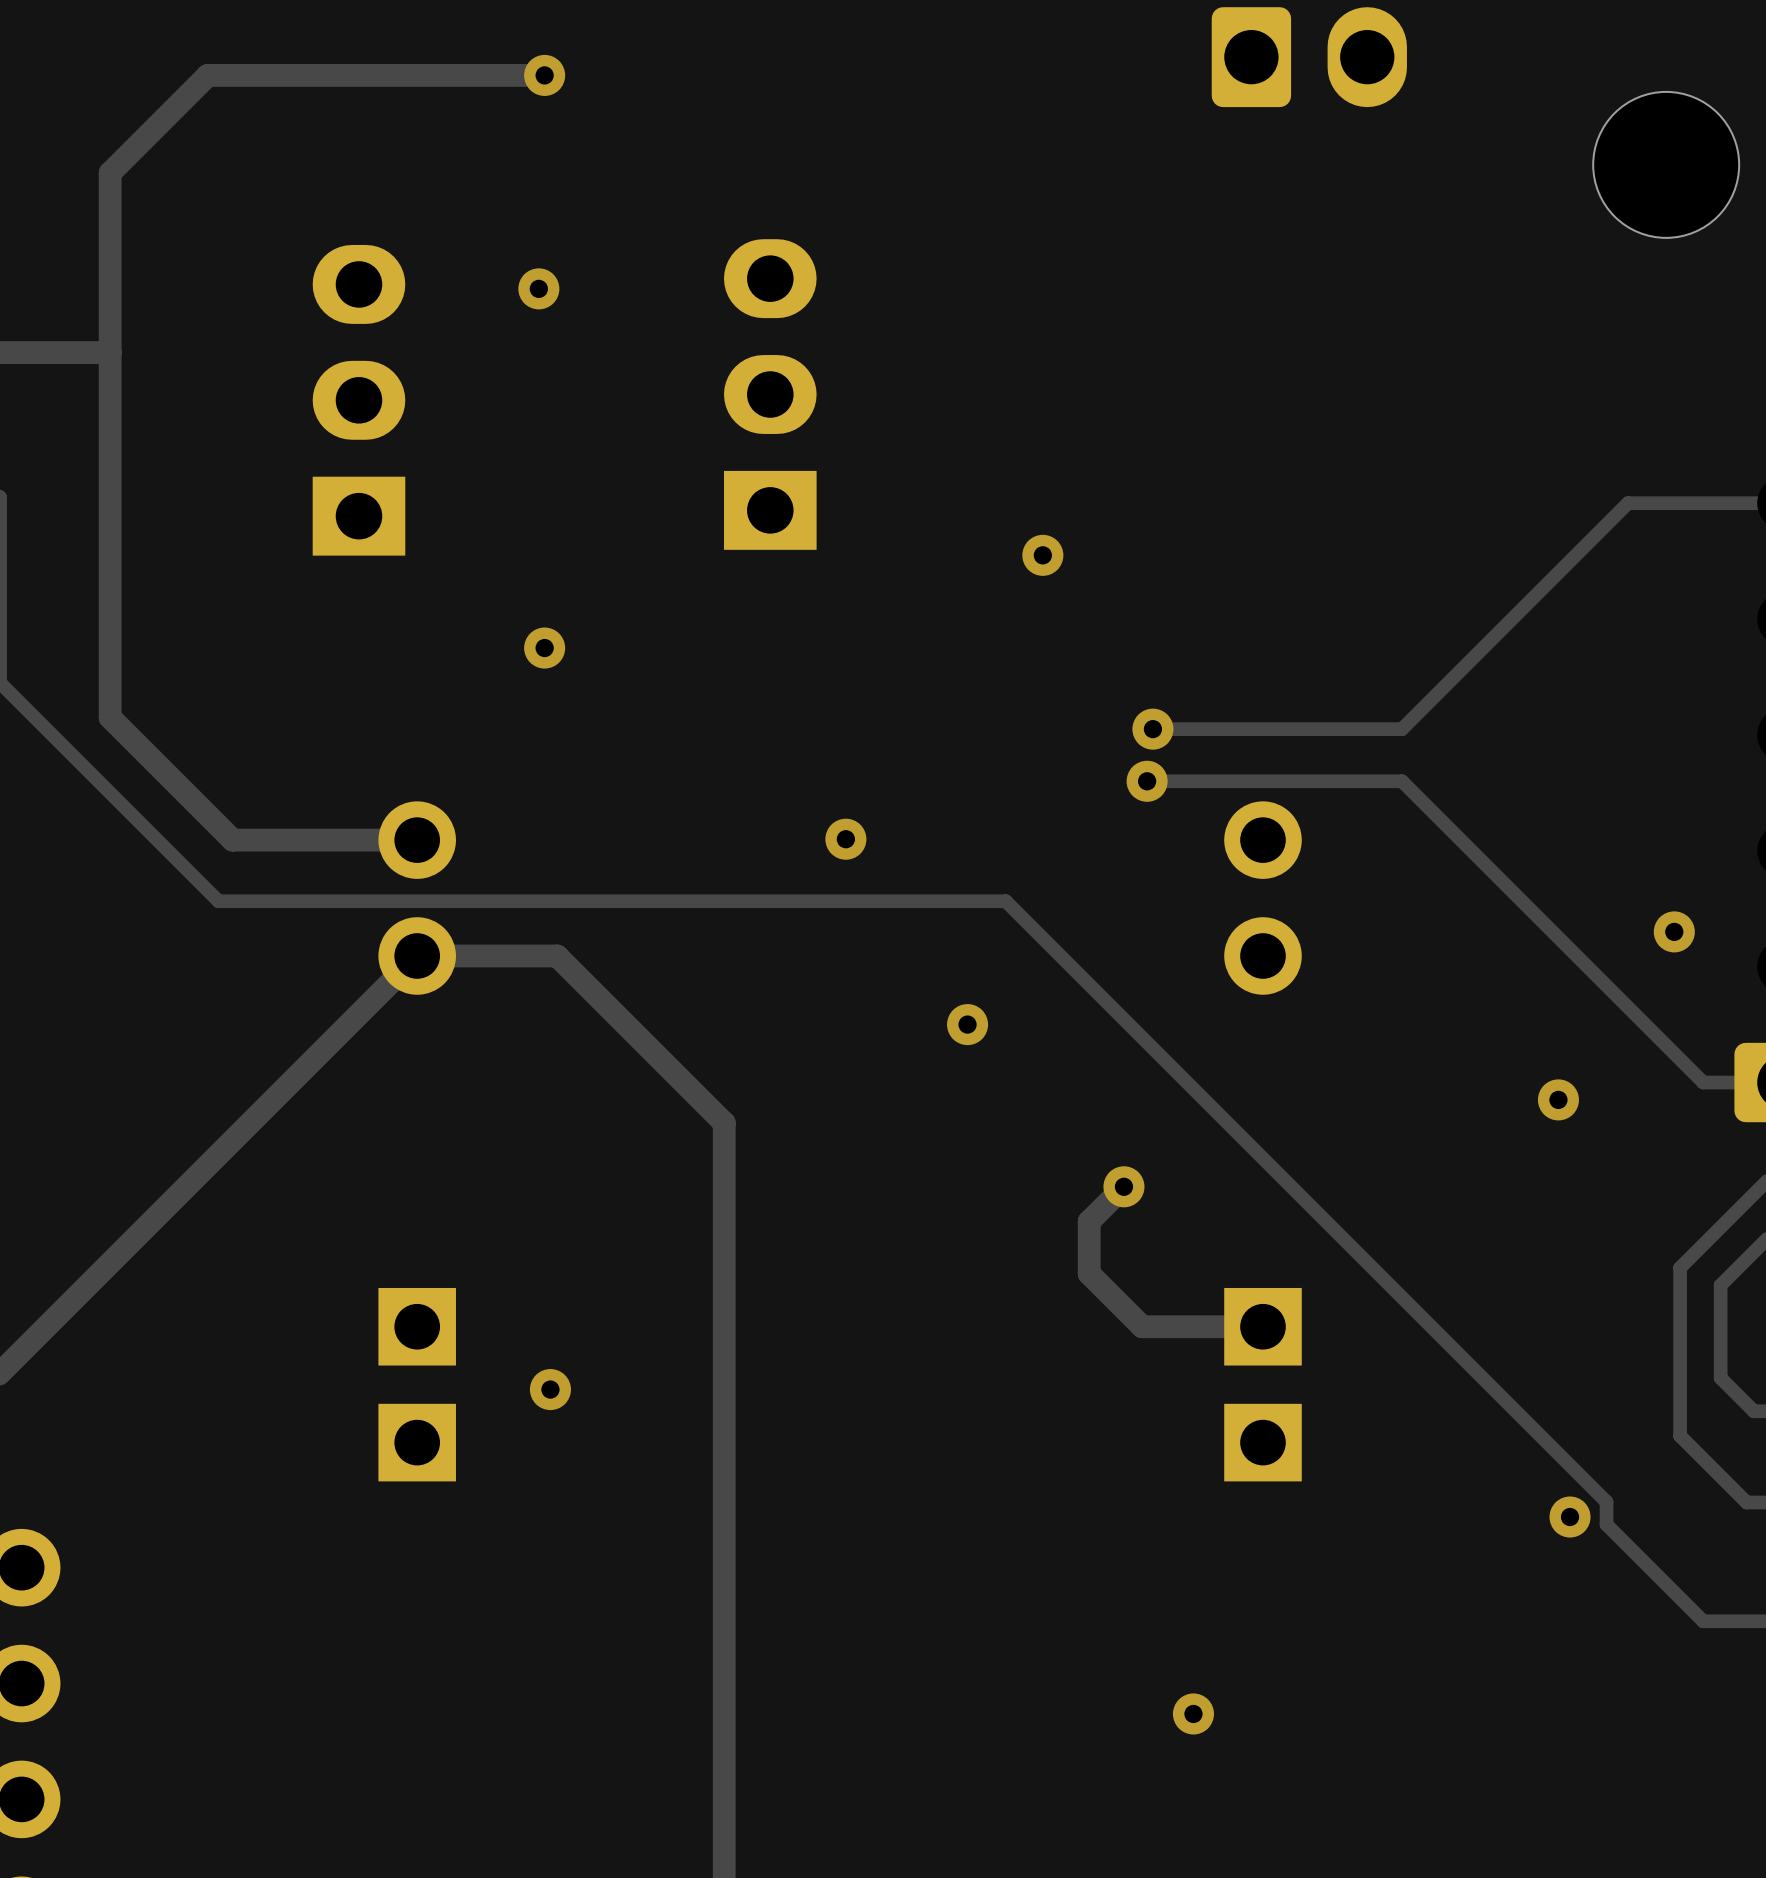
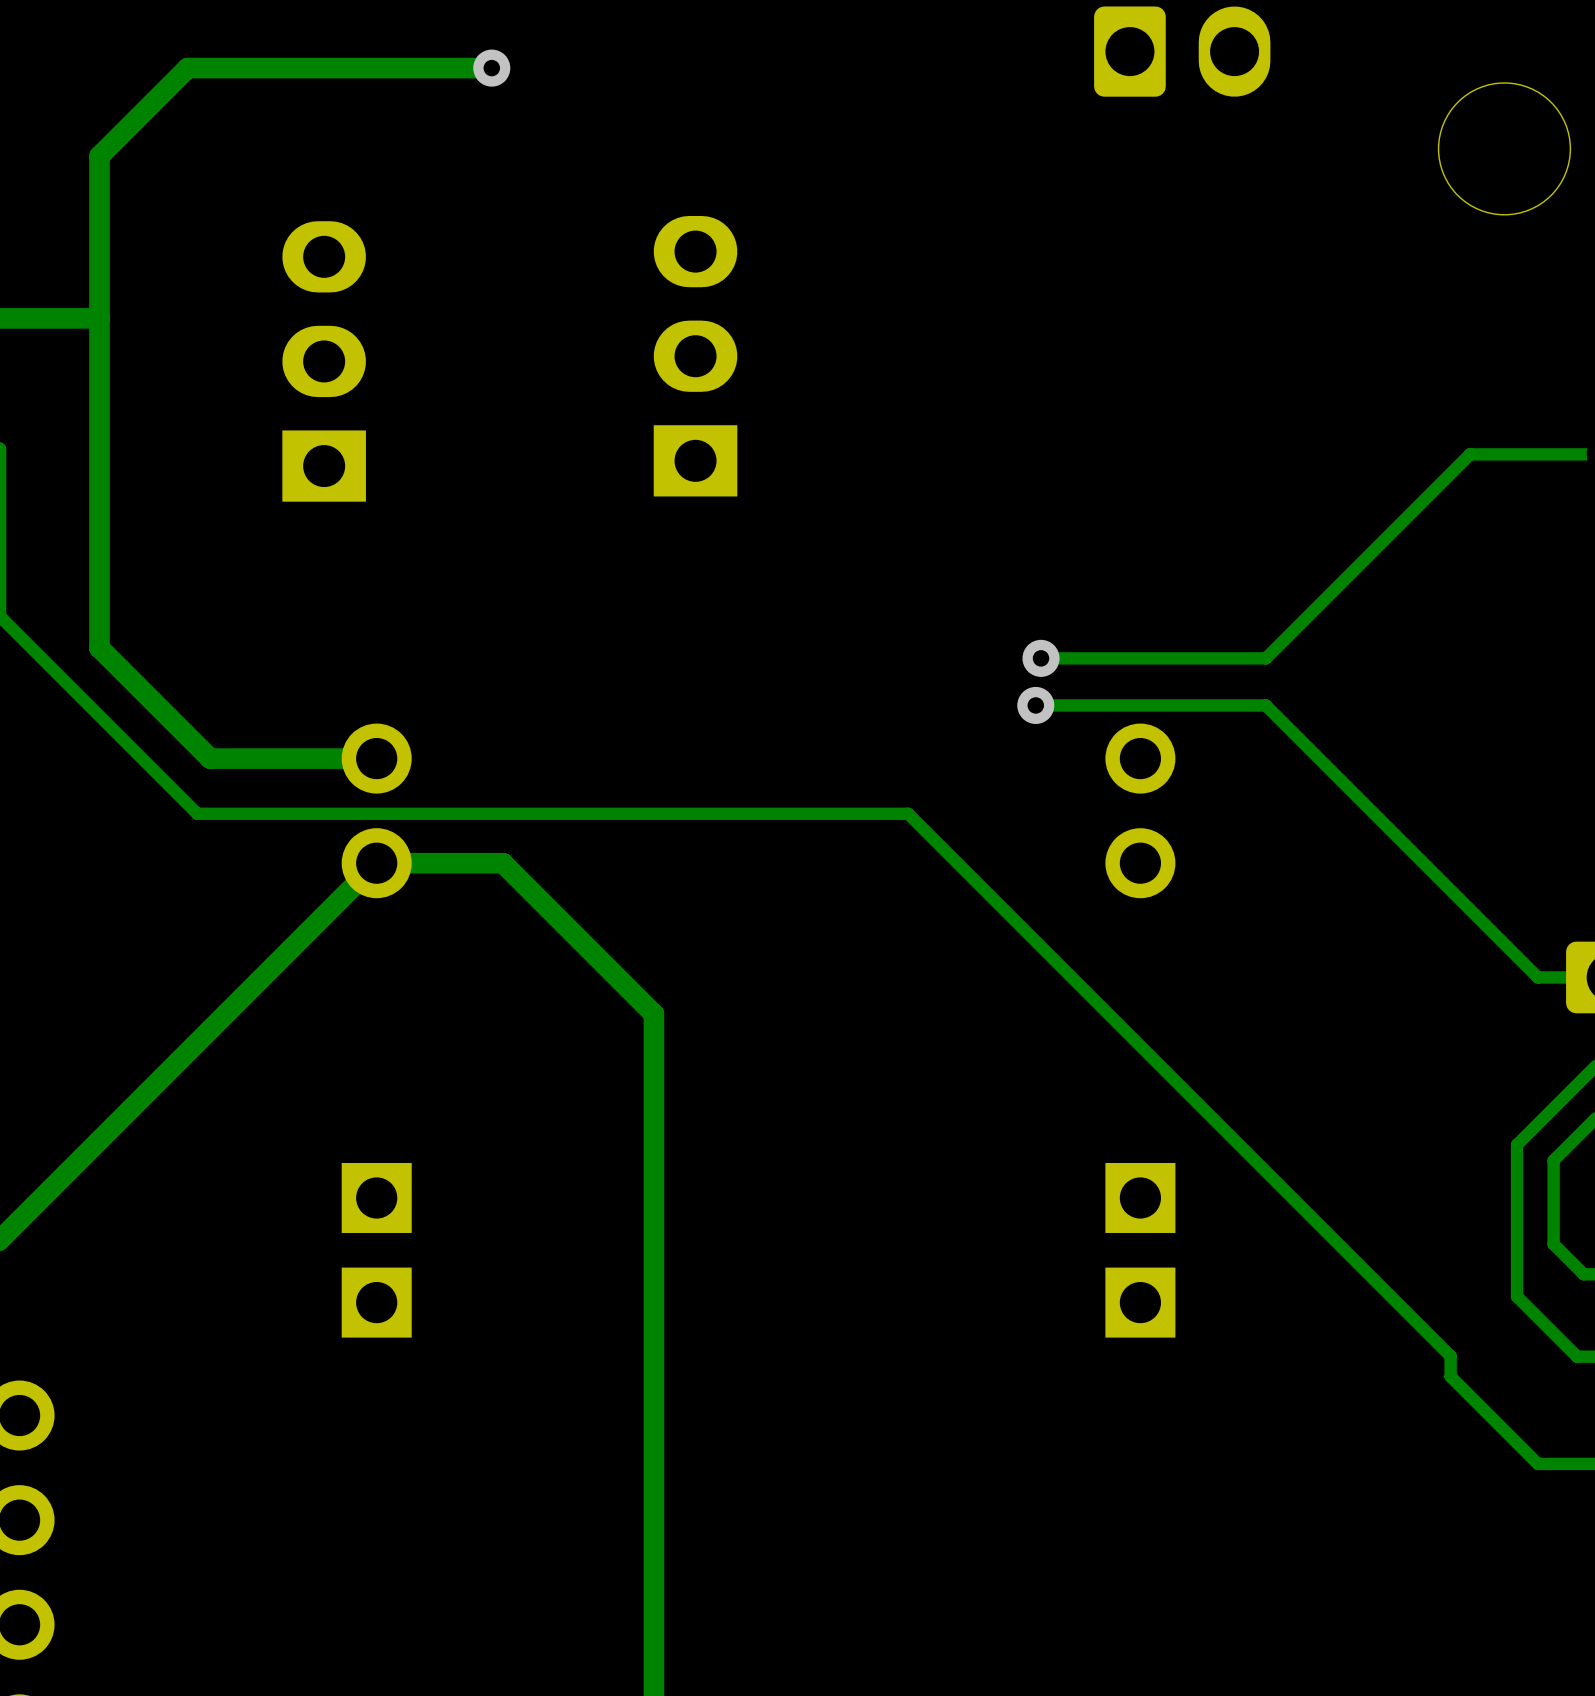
via: (538, 288) -> none
via: (1042, 555) -> none
via: (544, 648) -> none
via: (845, 839) -> none
via: (1674, 931) -> none
via: (967, 1024) -> none
via: (1558, 1099) -> none
track: (1123, 1186) (1089, 1221) (1089, 1273) (1142, 1326) (1262, 1326) -> none
via: (1123, 1186) -> none
via: (550, 1389) -> none
via: (1570, 1517) -> none
via: (1193, 1713) -> none

